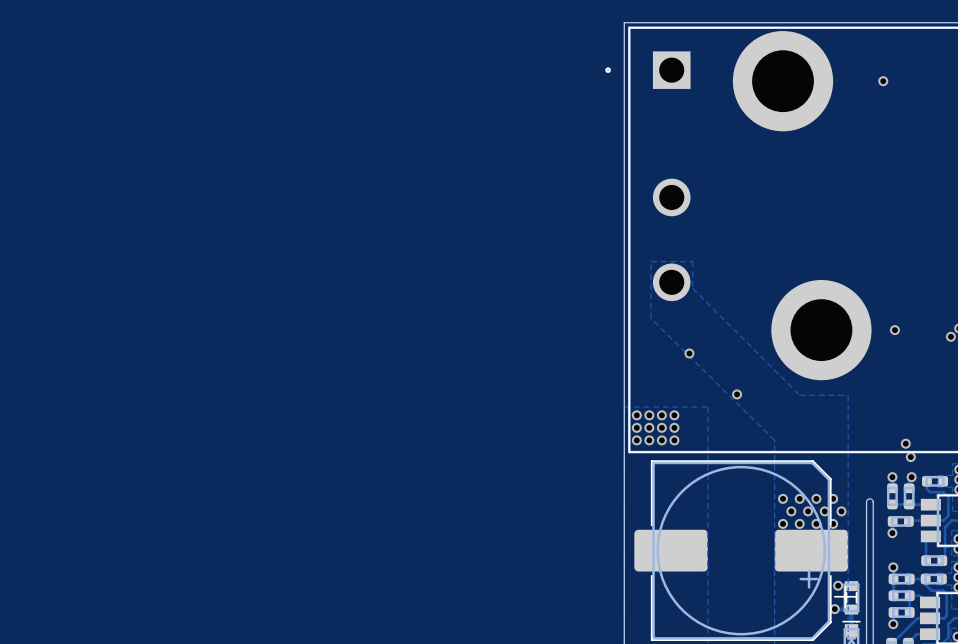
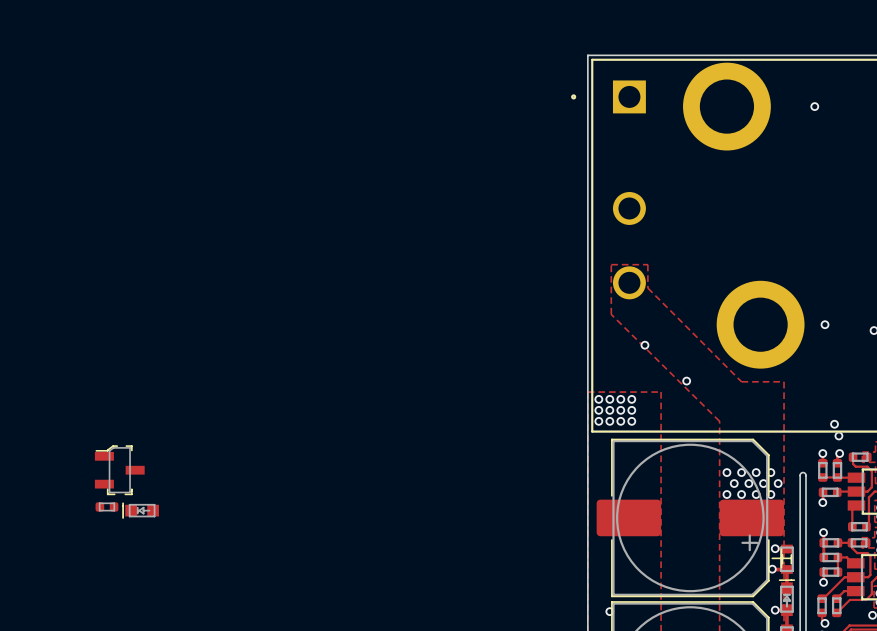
part: none -> (119, 470)
part: none -> (106, 506)
part: none -> (140, 510)

